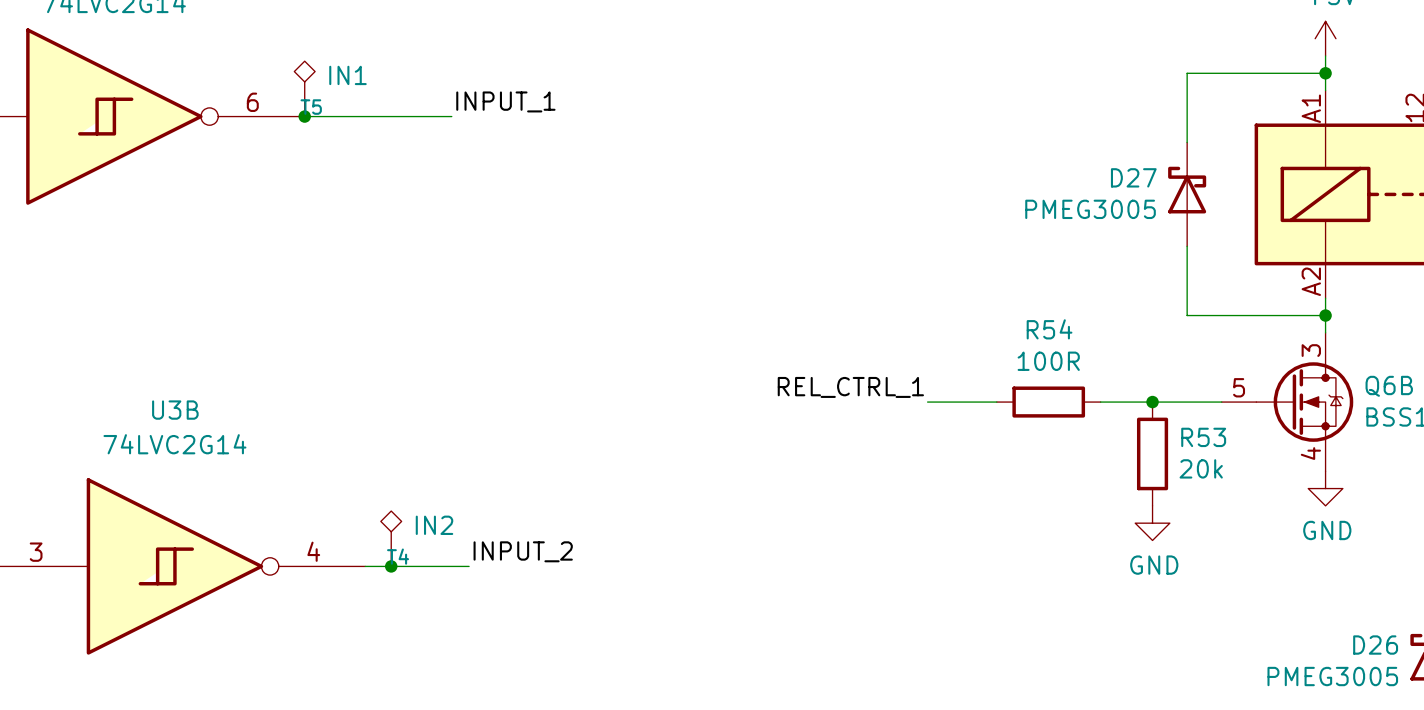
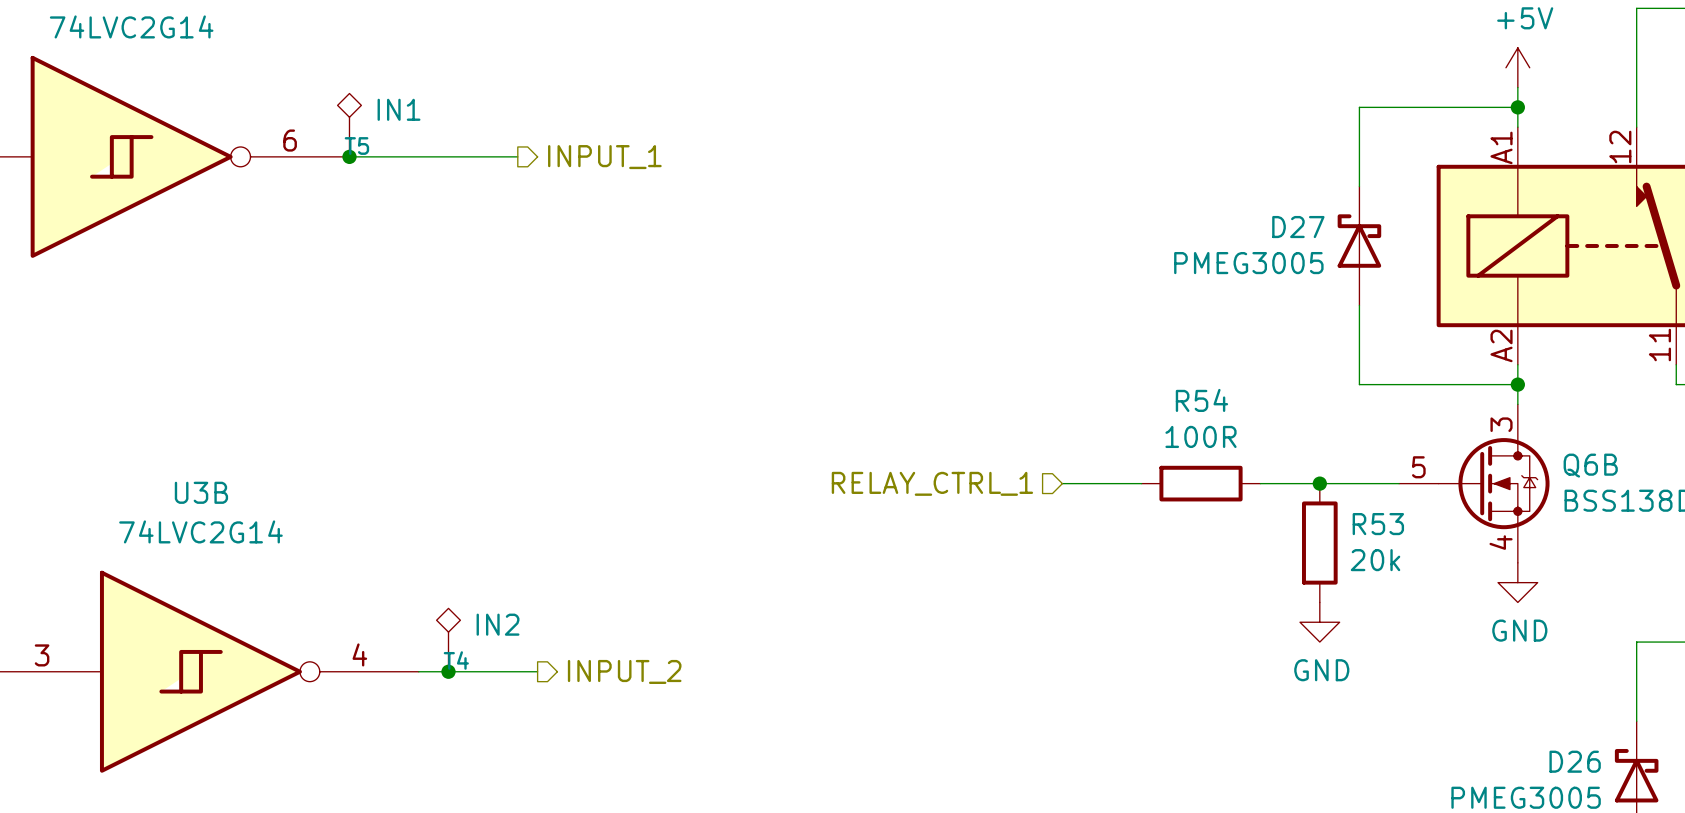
label: INPUT_1 (505, 101) -> none
hierarchical label: none -> INPUT_1 (604, 157)
label: REL_CTRL_1 (850, 387) -> none
hierarchical label: none -> RELAY_CTRL_1 (932, 483)
label: INPUT_2 (523, 551) -> none
hierarchical label: none -> INPUT_2 (624, 671)

